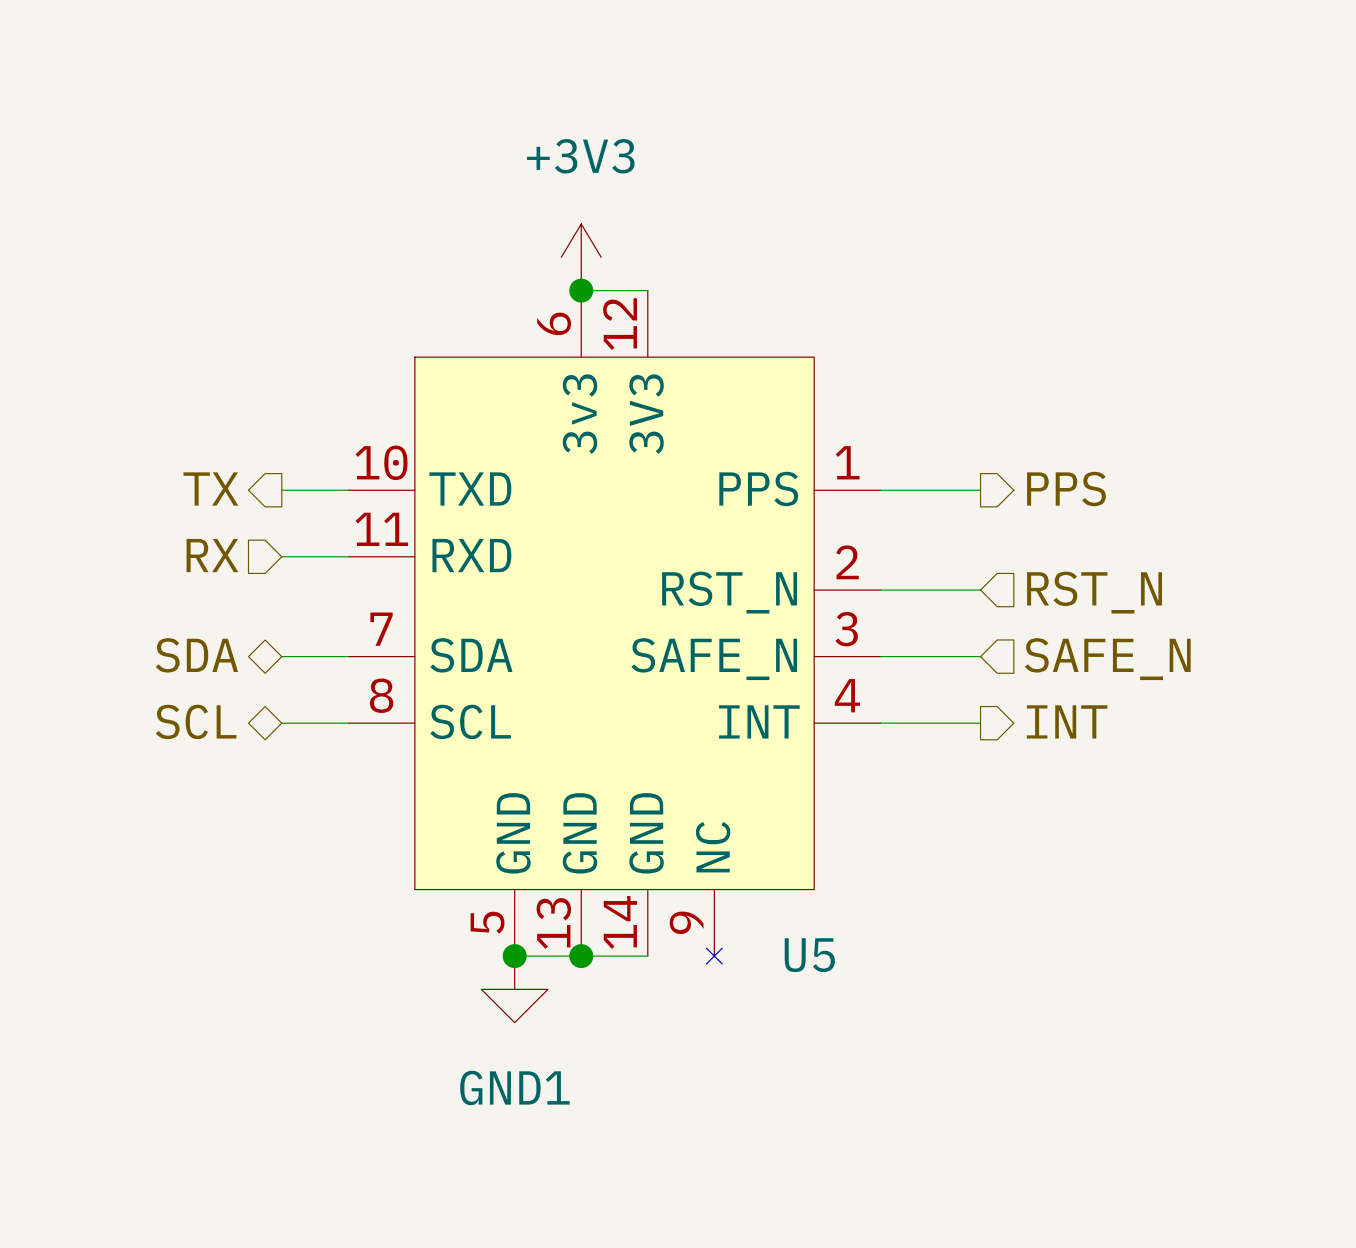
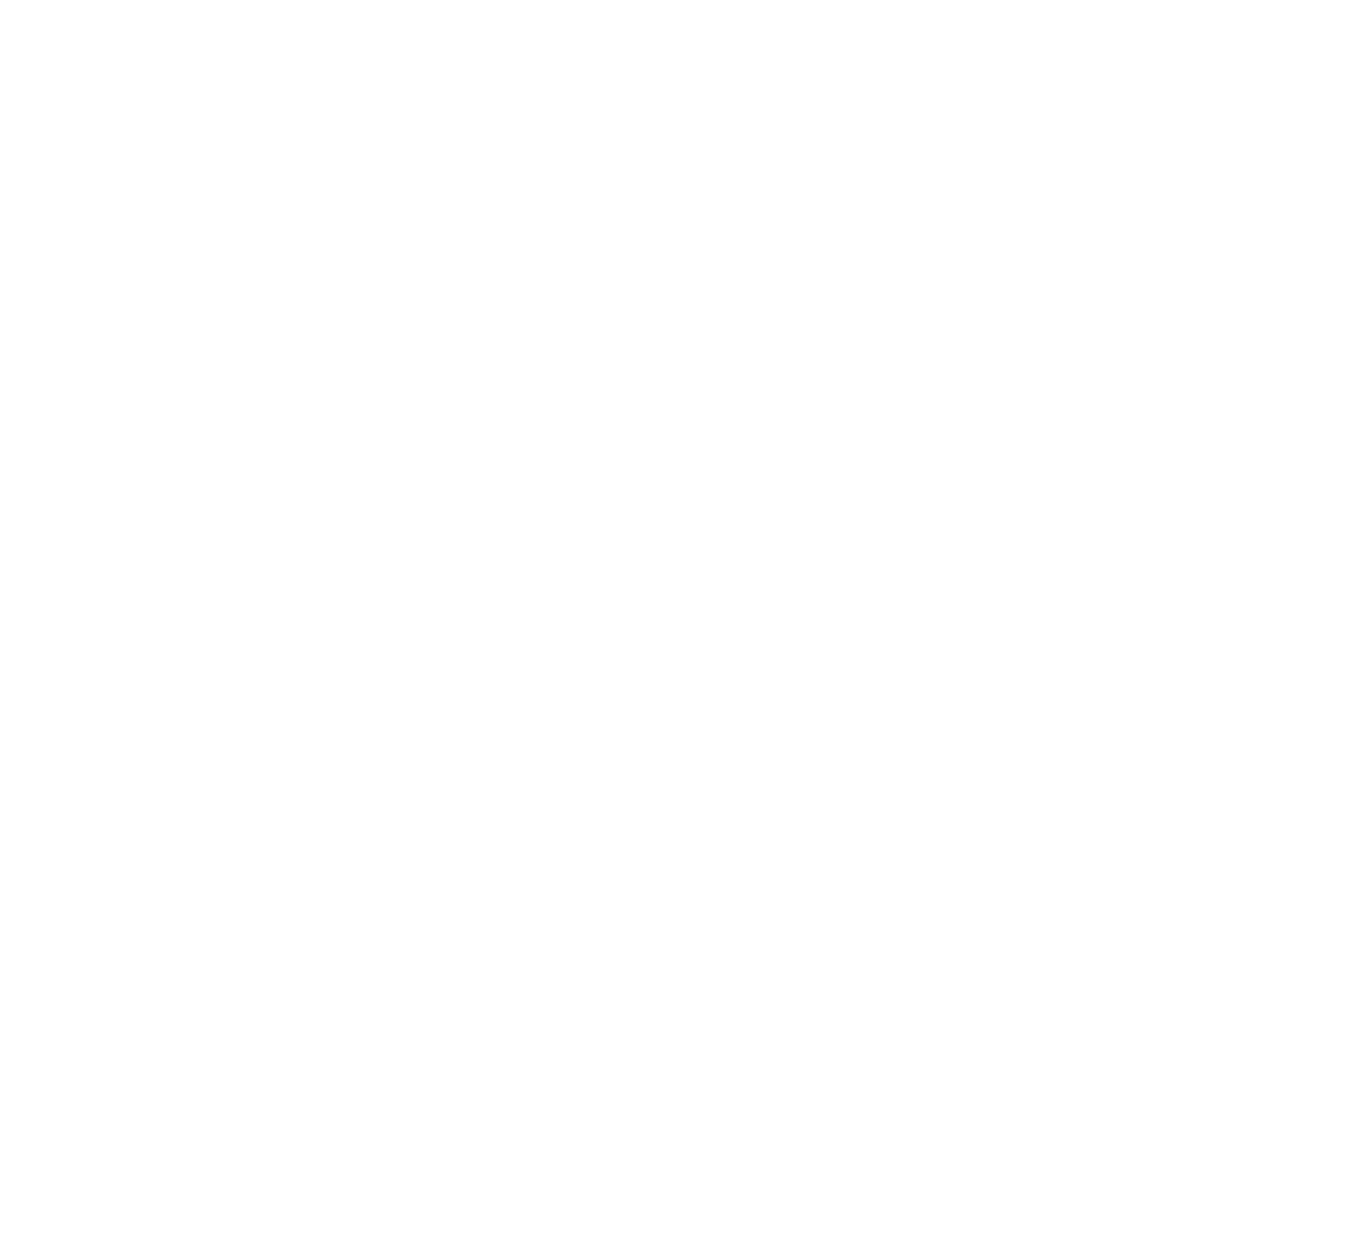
power symbol: +3V3 (581, 257) -> none
wire: (581, 290) (647, 290) -> none
junction: (581, 290) -> none
hierarchical label: TX (210, 489) -> none
hierarchical label: PPS (1066, 489) -> none
wire: (281, 490) (348, 490) -> none
wire: (880, 490) (980, 490) -> none
hierarchical label: RX (212, 555) -> none
wire: (281, 556) (348, 556) -> none
wire: (880, 590) (980, 590) -> none
hierarchical label: RST_N (1094, 592) -> none
U5: (614, 627) -> none
hierarchical label: SDA (196, 655) -> none
wire: (281, 656) (348, 656) -> none
wire: (880, 656) (980, 656) -> none
hierarchical label: SAFE_N (1107, 659) -> none
hierarchical label: SCL (196, 721) -> none
hierarchical label: INT (1067, 721) -> none
wire: (281, 723) (348, 723) -> none
wire: (880, 723) (980, 723) -> none
wire: (514, 956) (647, 956) -> none
junction: (514, 956) -> none
junction: (581, 956) -> none
power symbol: GND1 (514, 989) -> none

